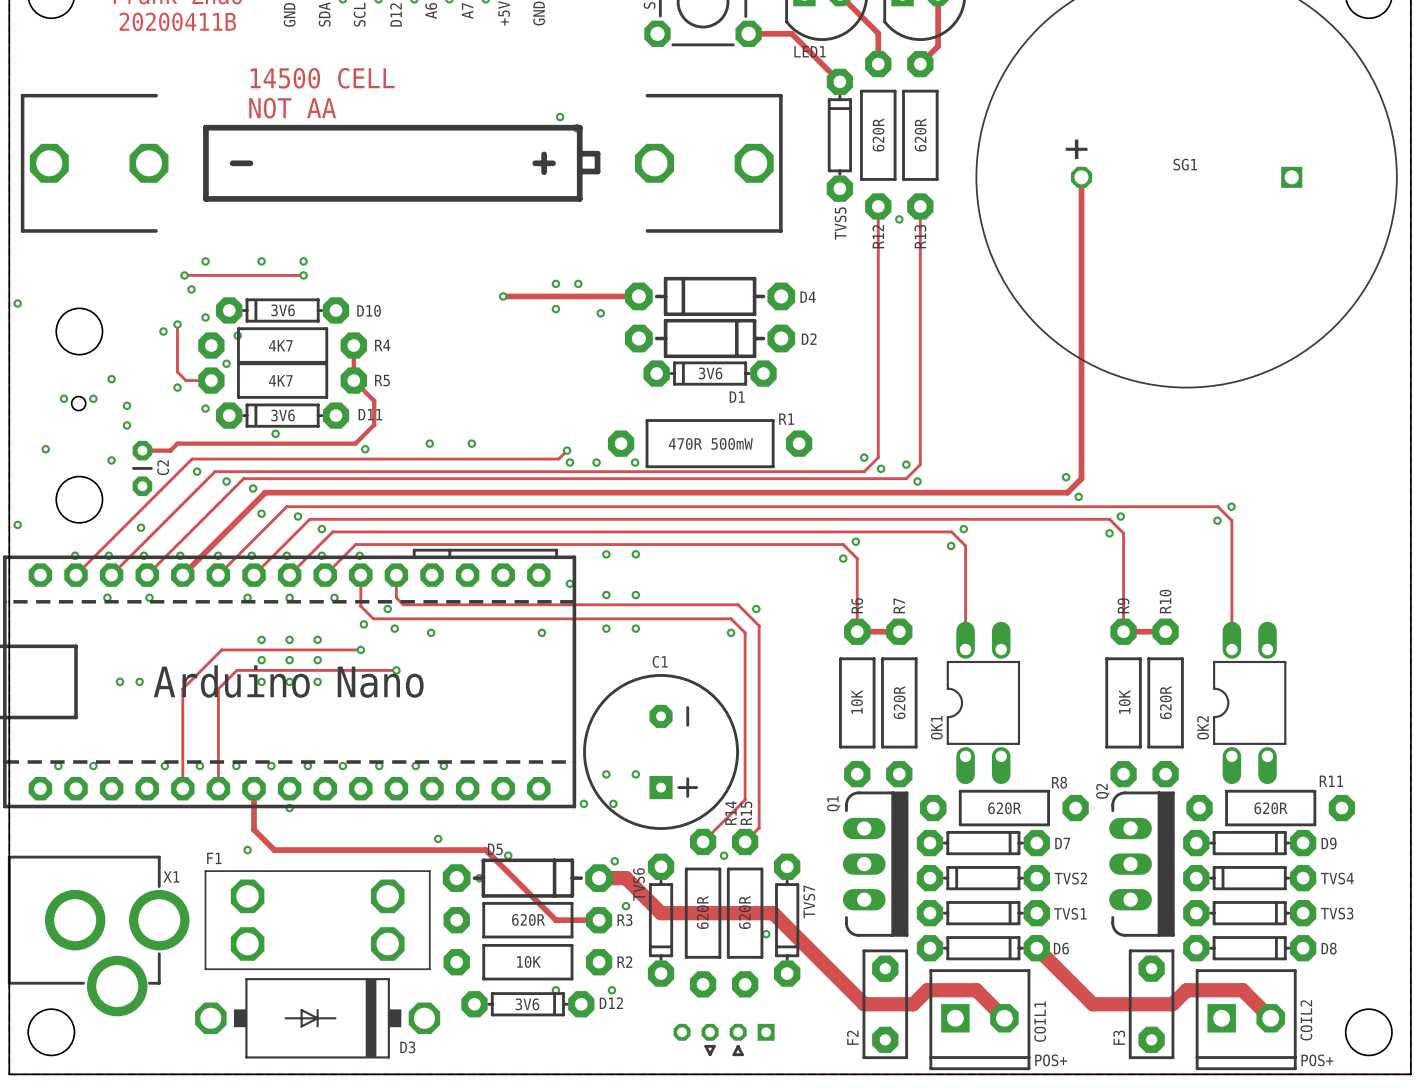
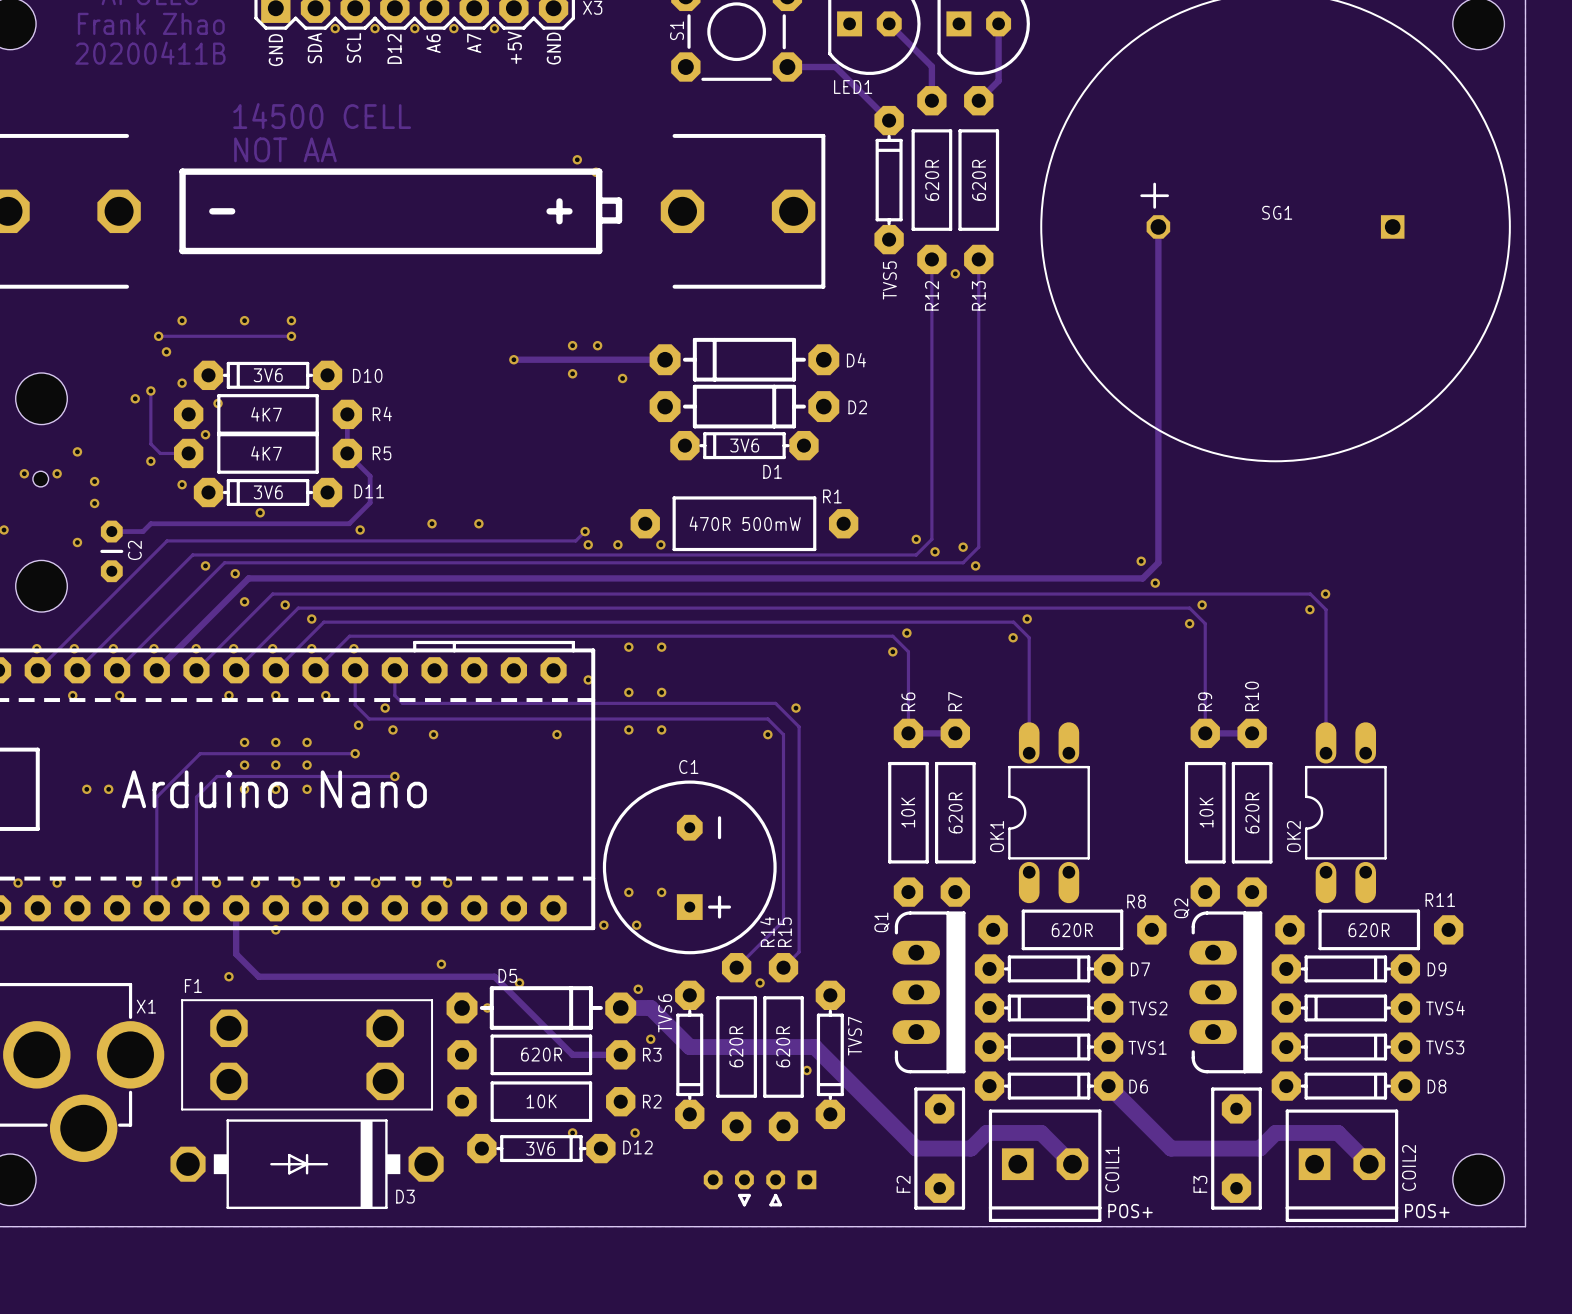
via: (197, 471) -> none
via: (141, 527) -> none

